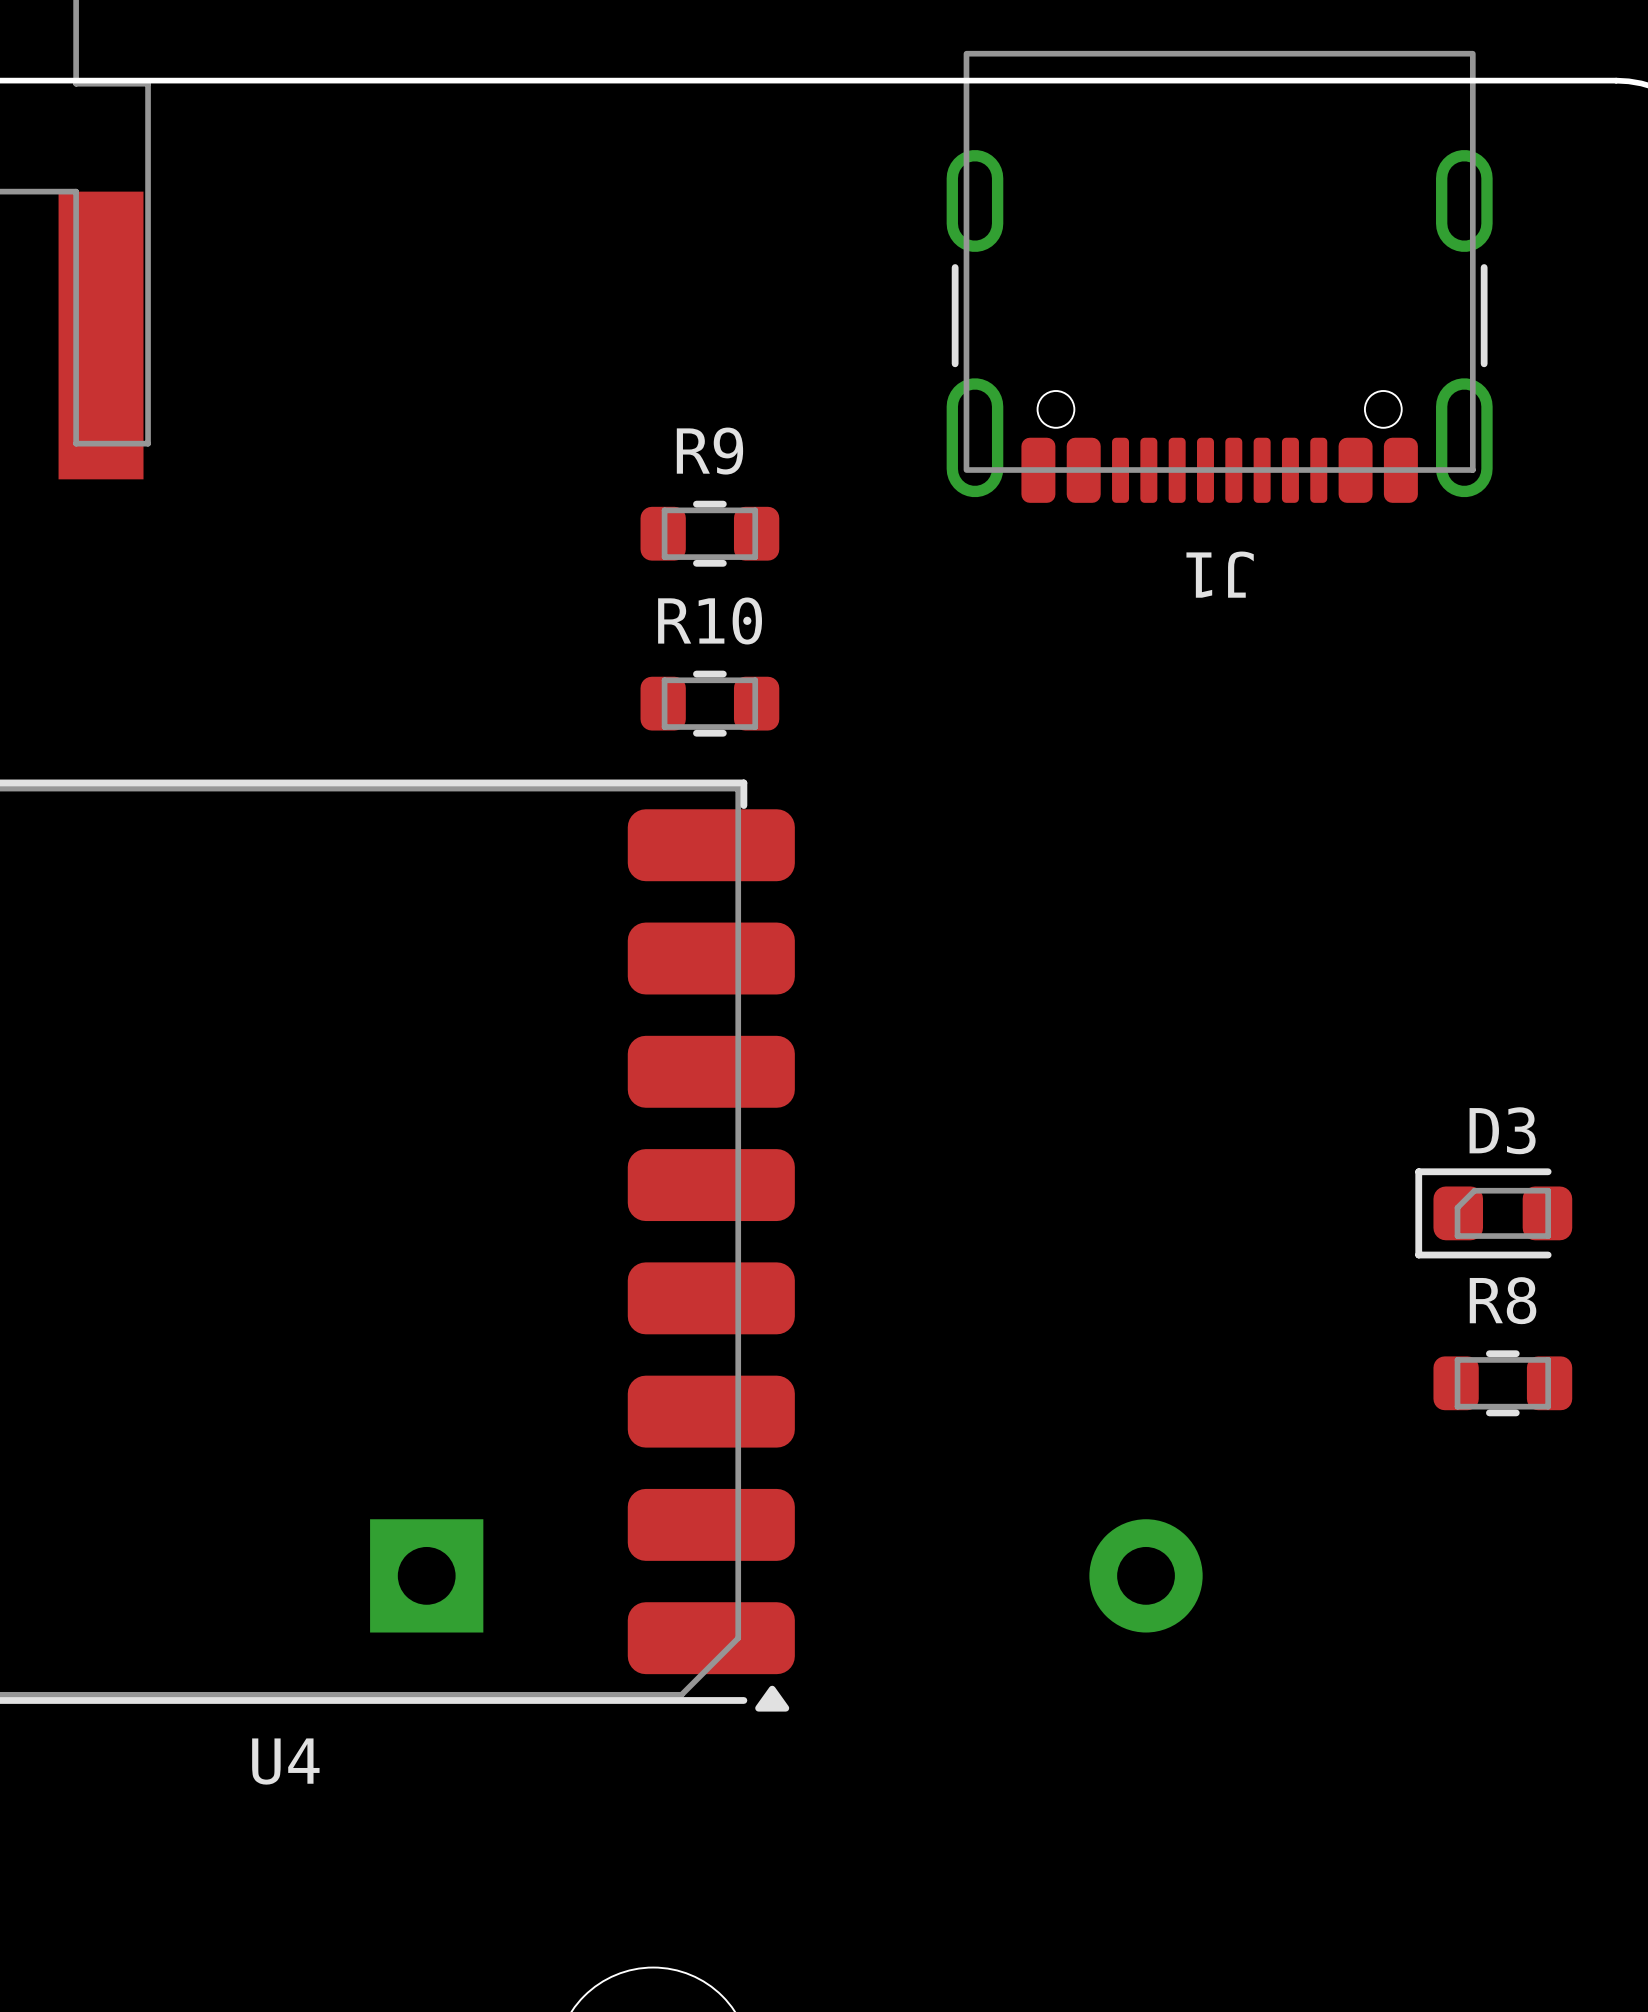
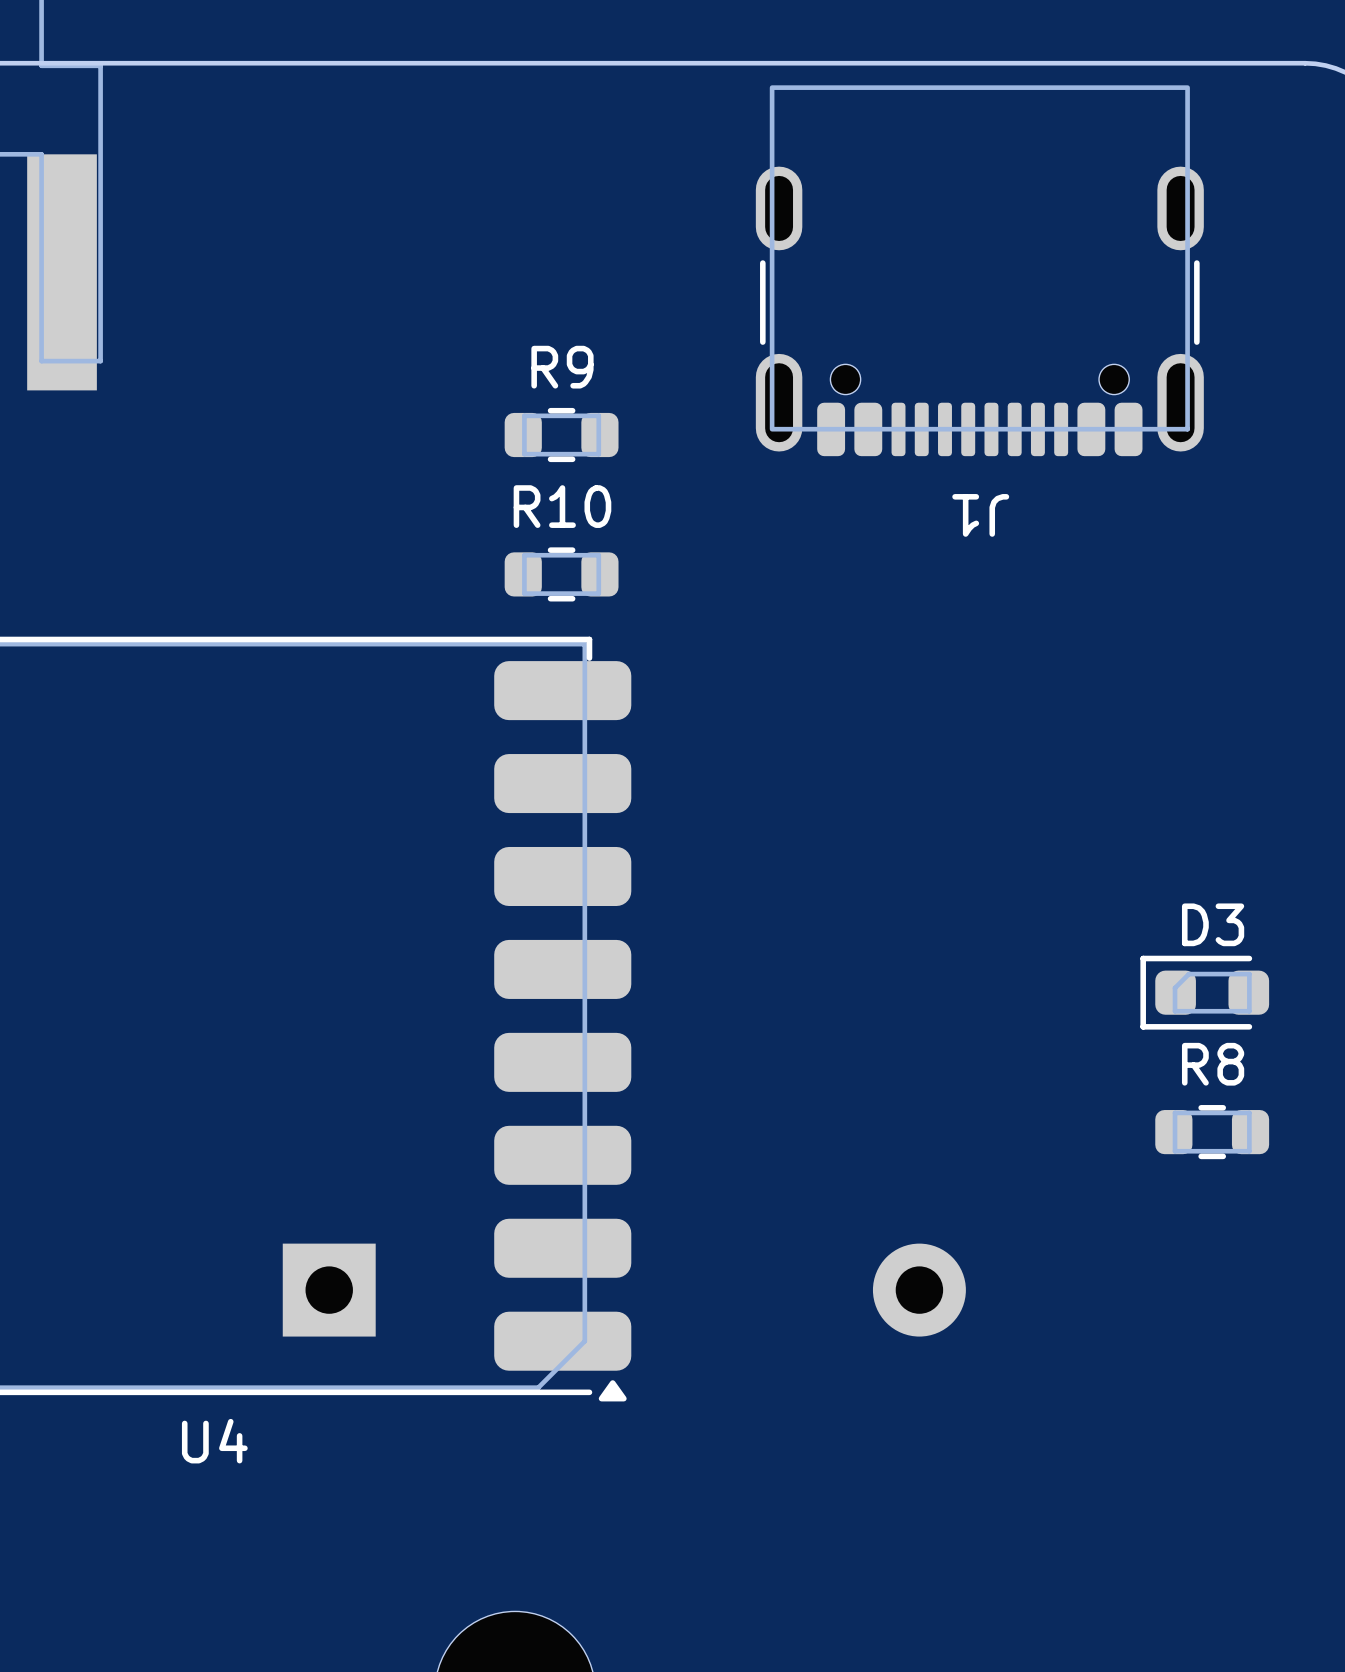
J1 position: (1219, 276) -> (979, 270)

